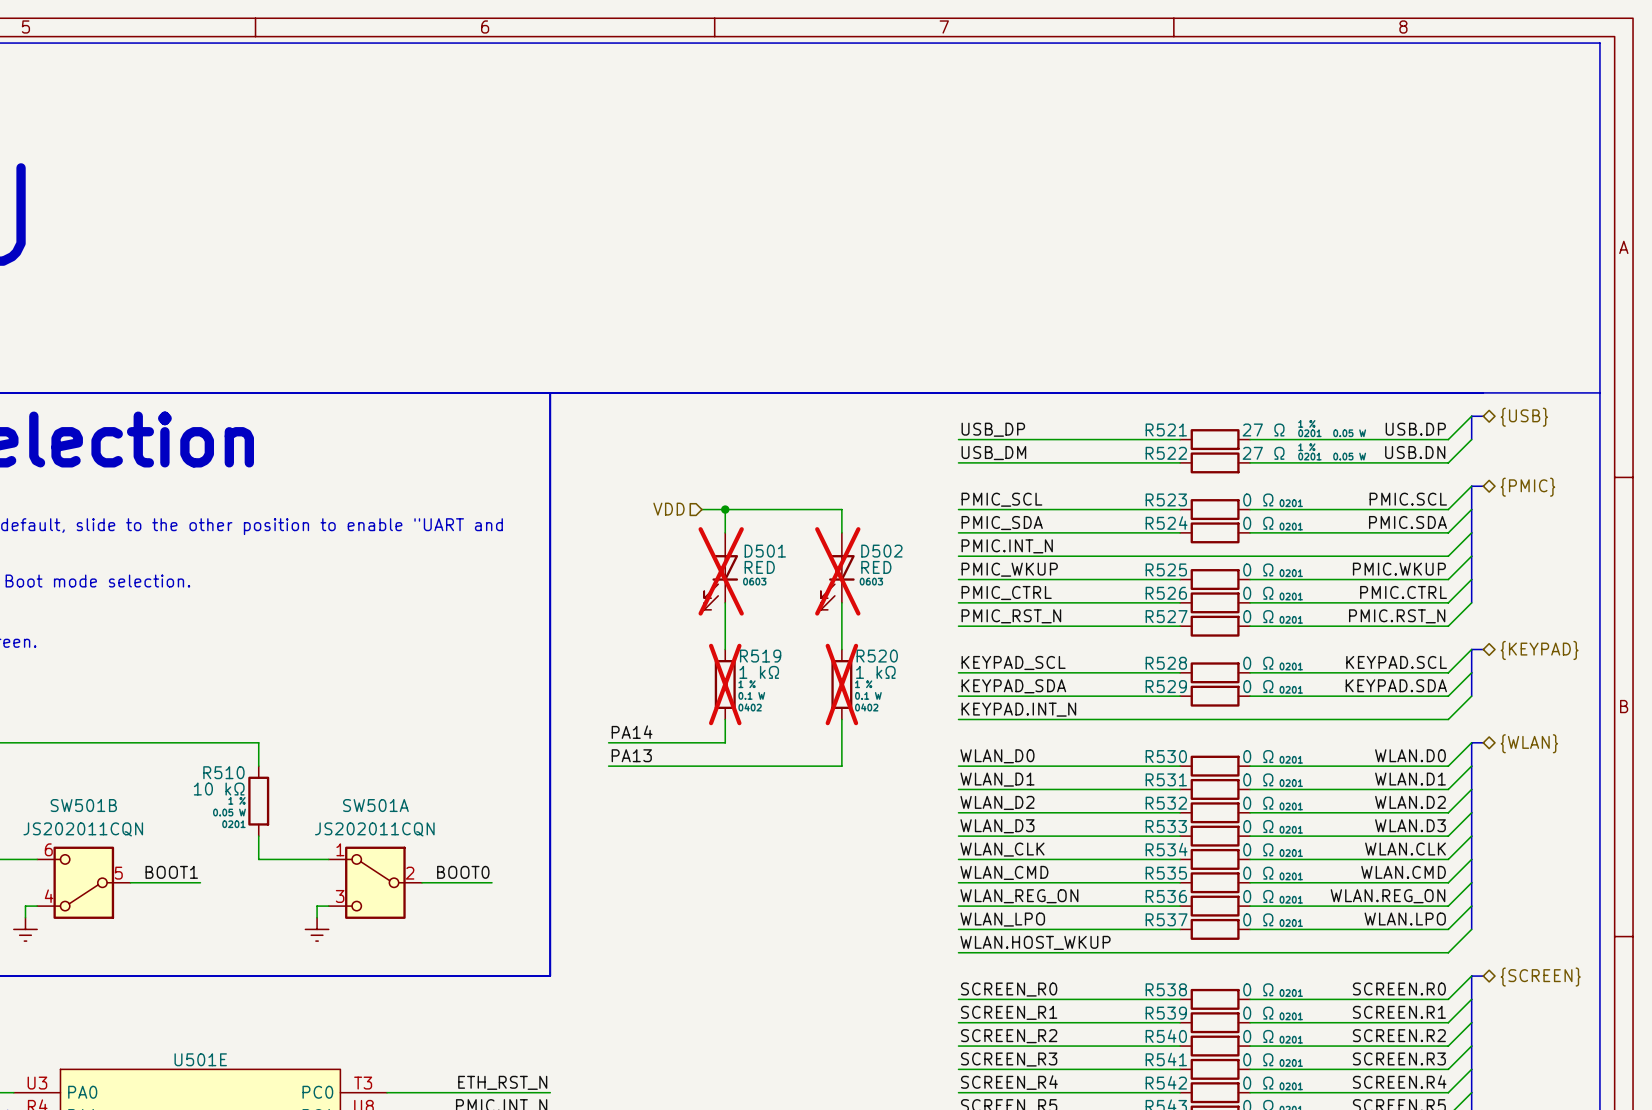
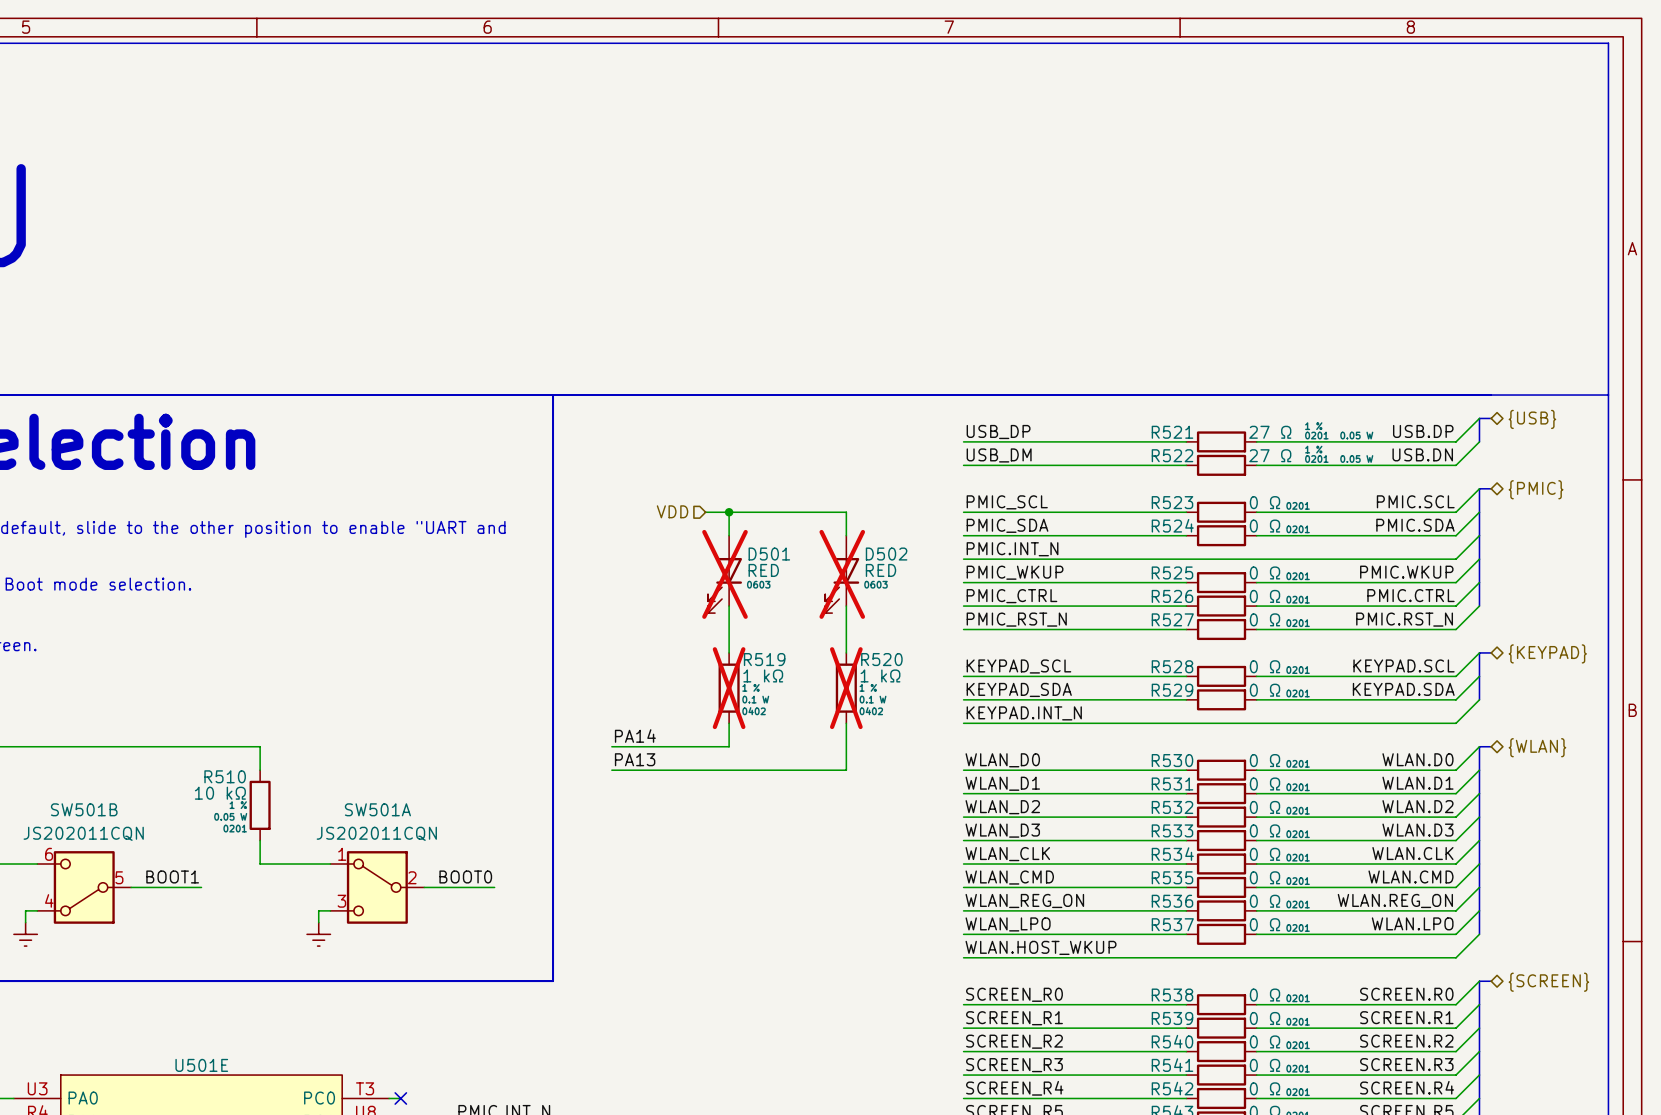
label: ETH_RST_N (502, 1082) -> none
wire: (398, 1092) (550, 1092) -> none
no-connect mark: none -> (400, 1098)

